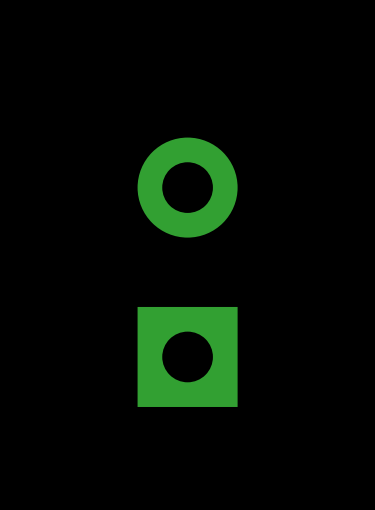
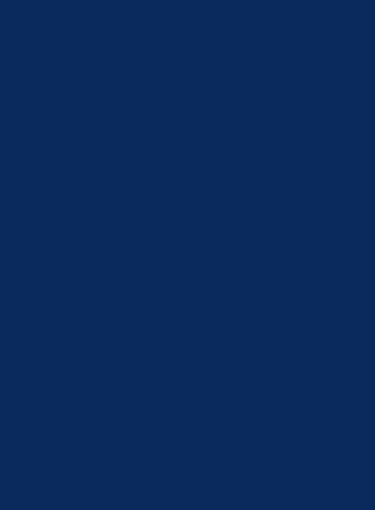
part: (187, 272) -> none

